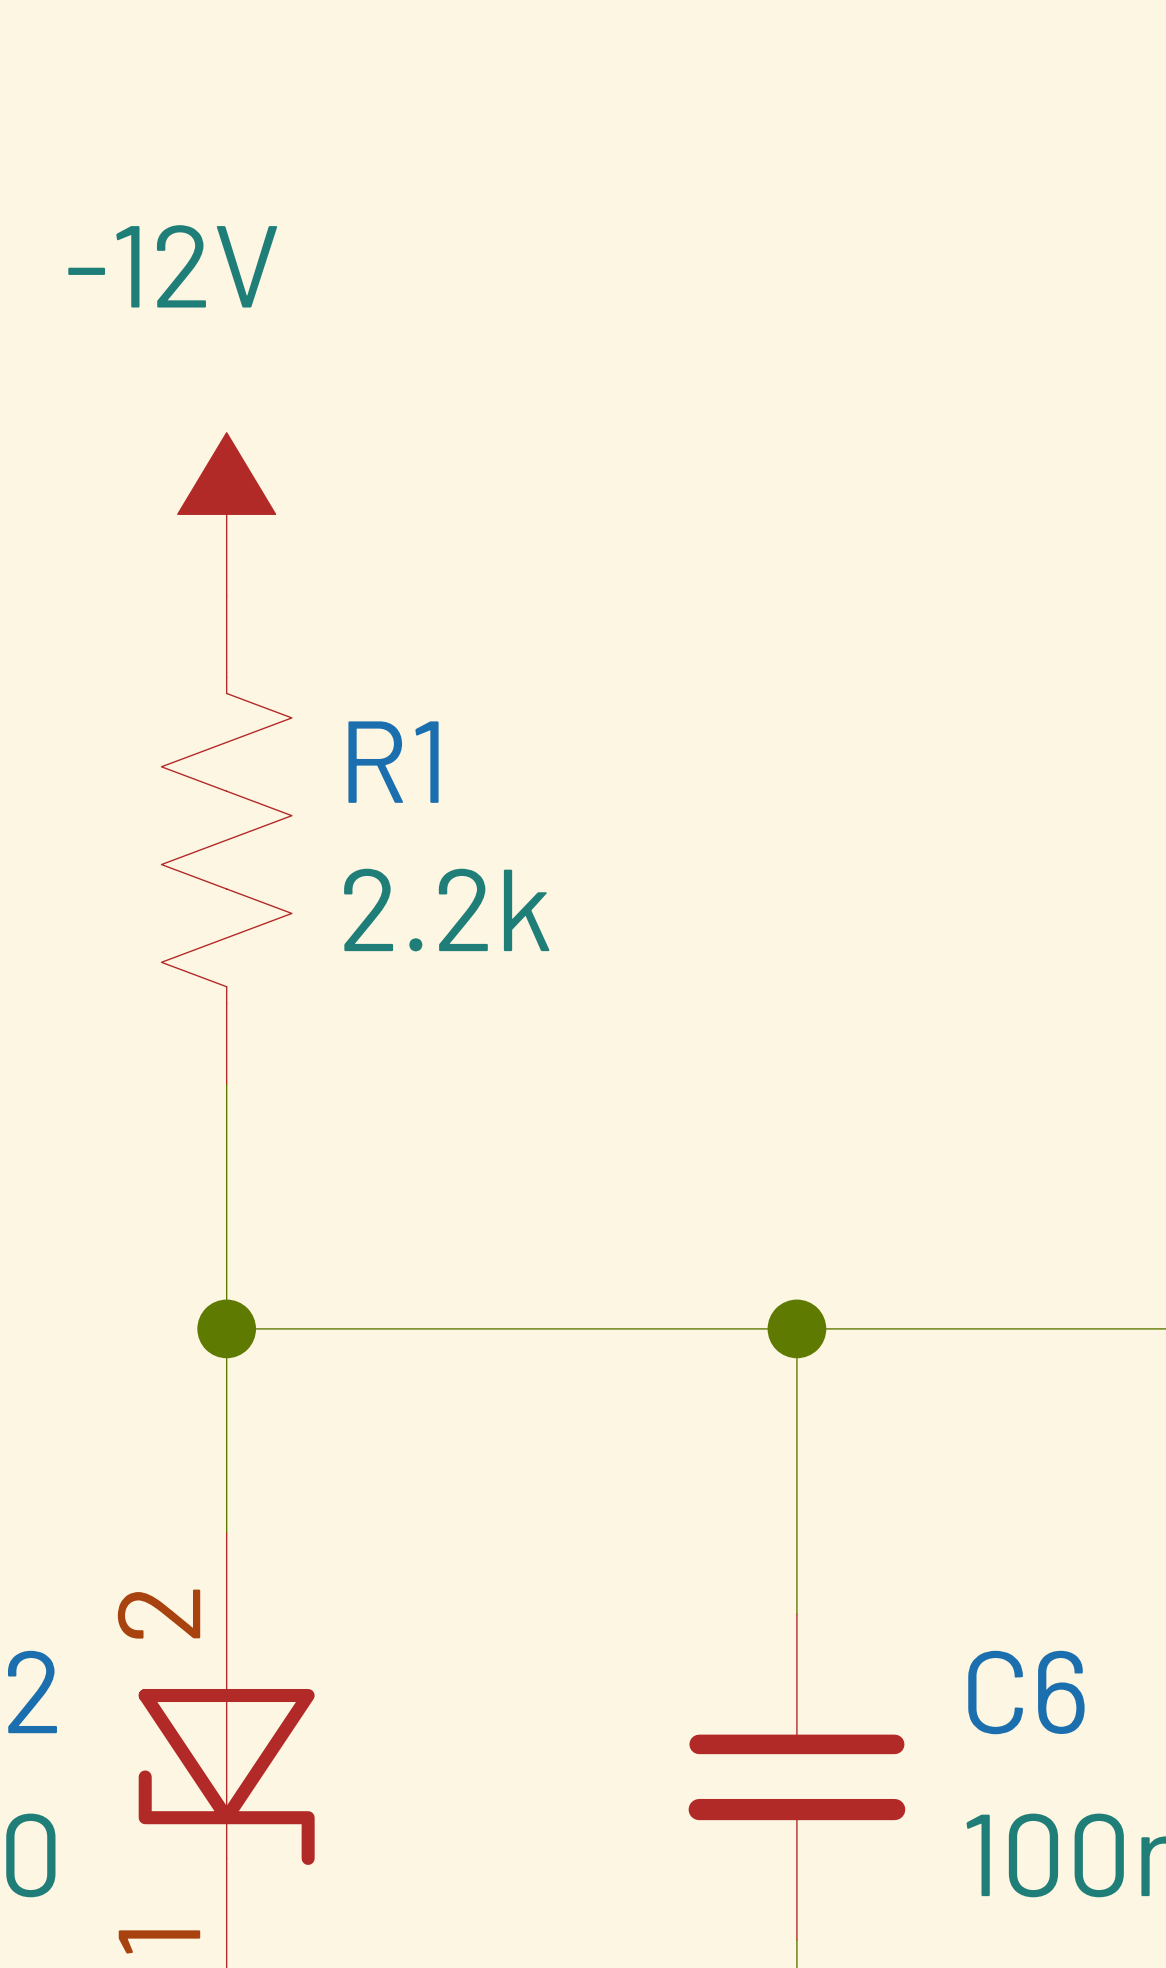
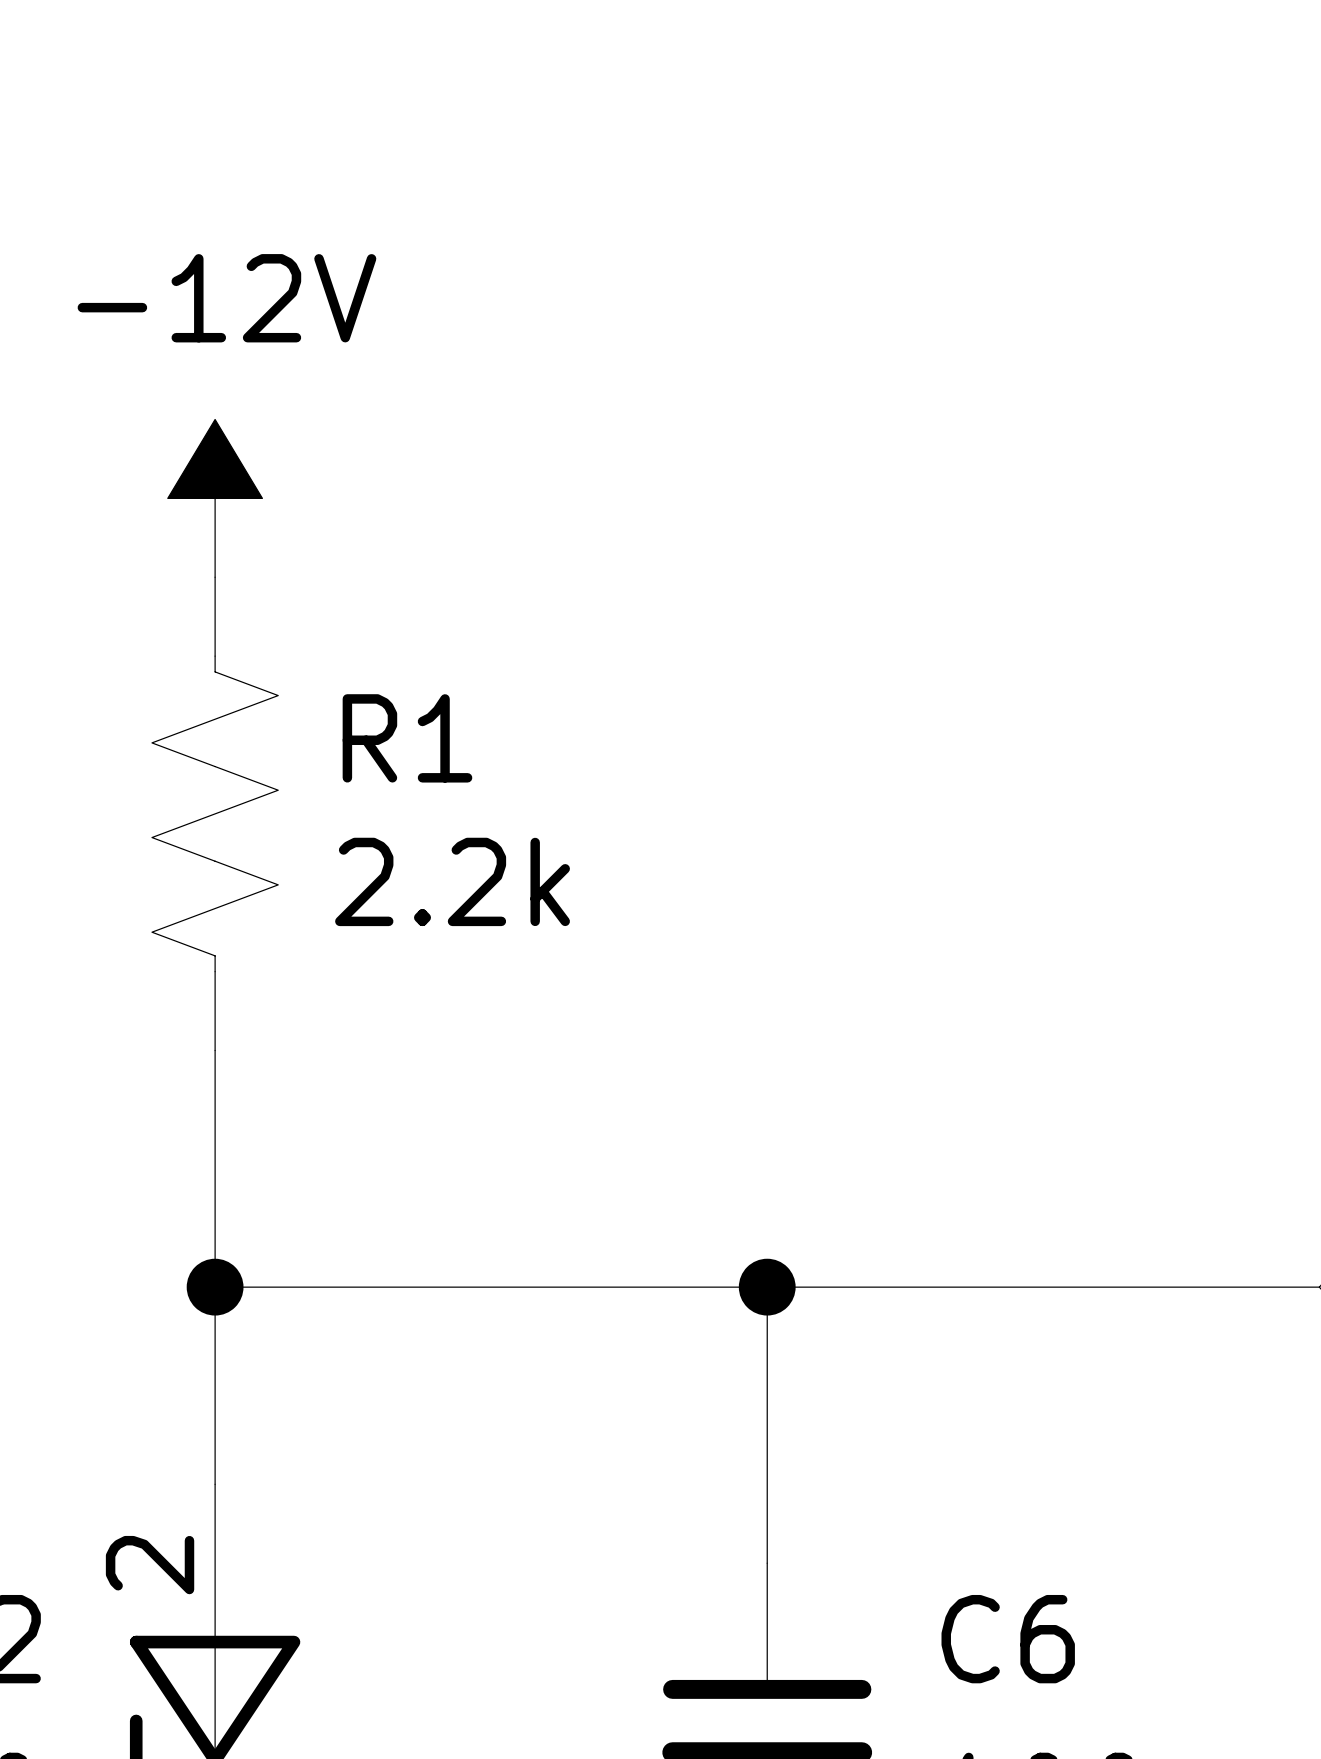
power symbol text position: -12V (172, 266) -> -12V (226, 298)

